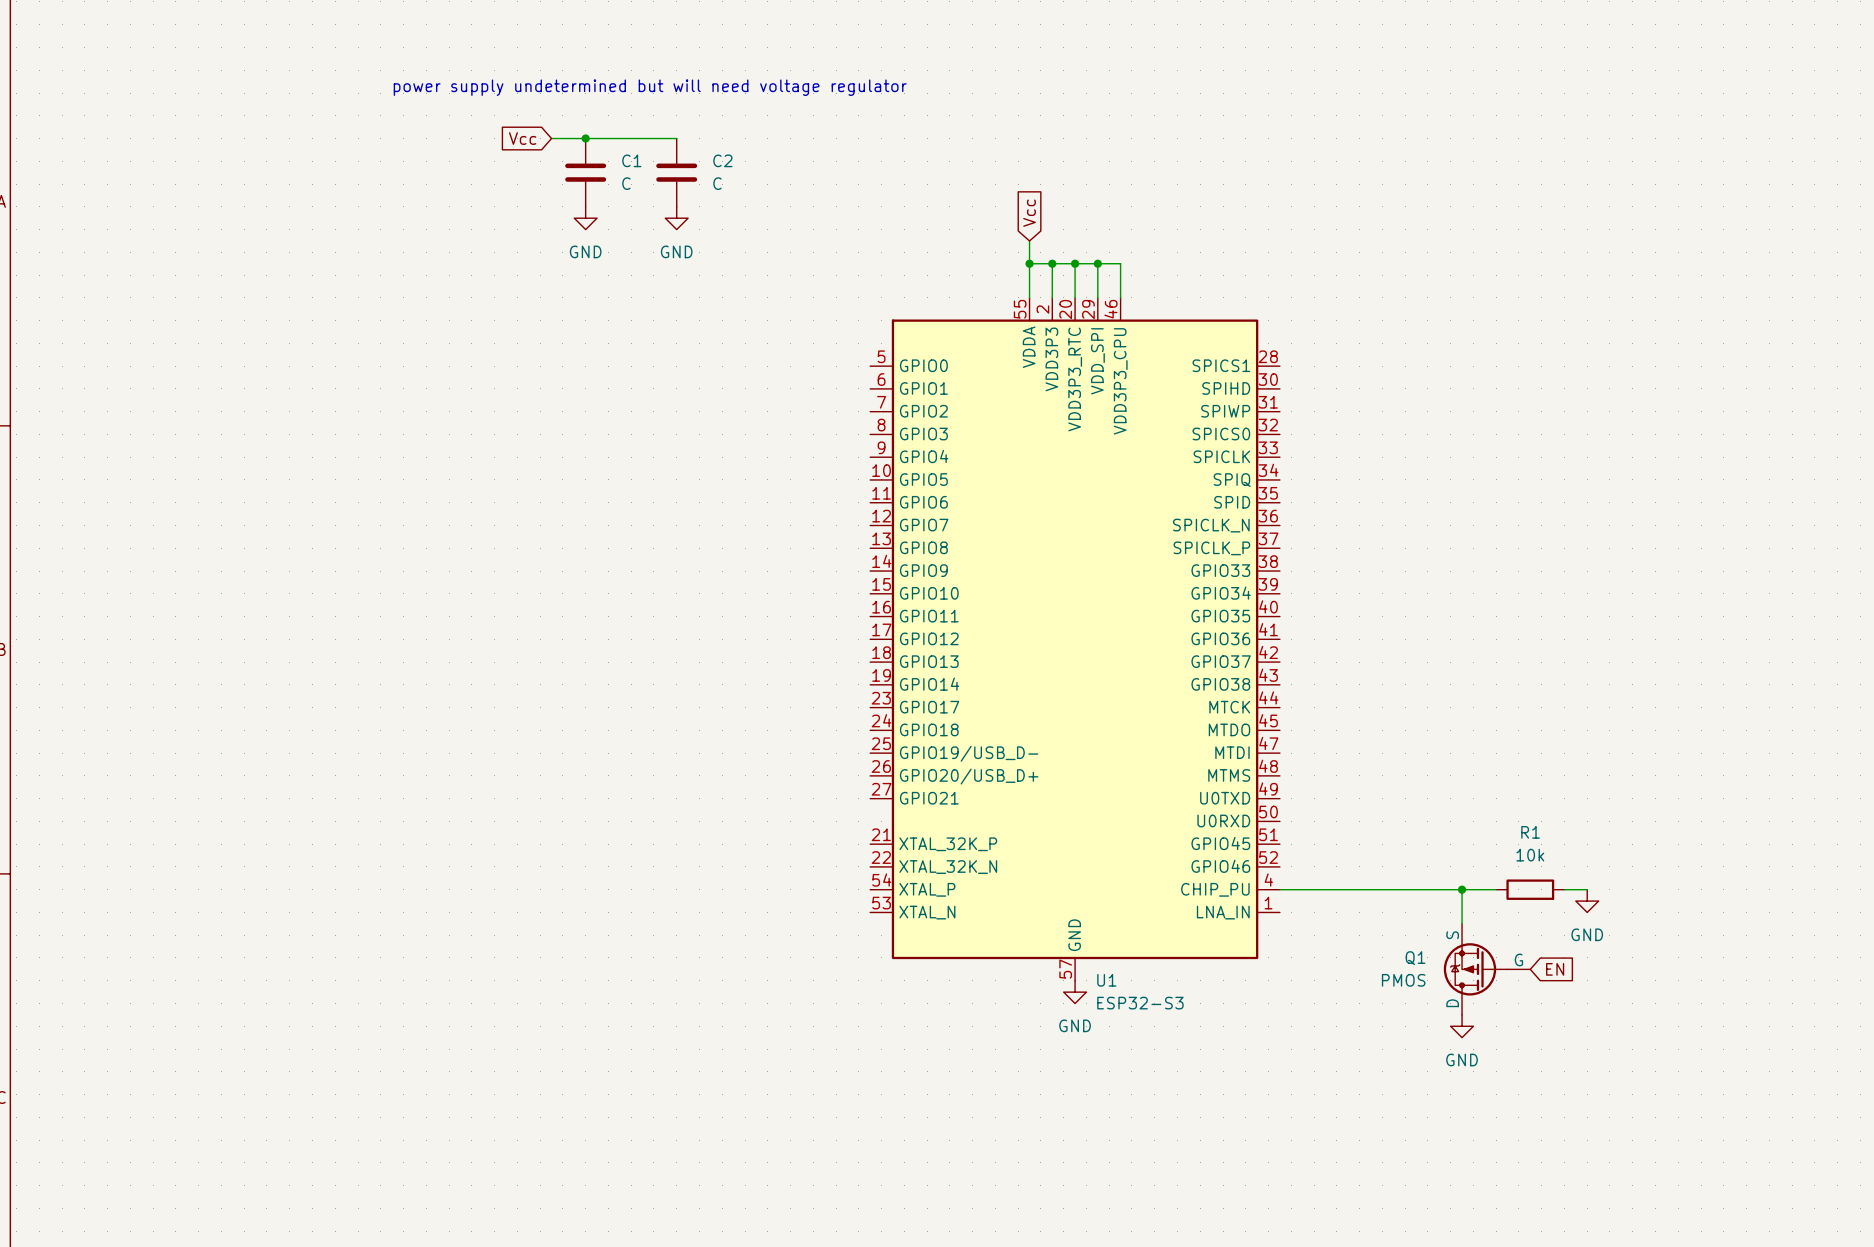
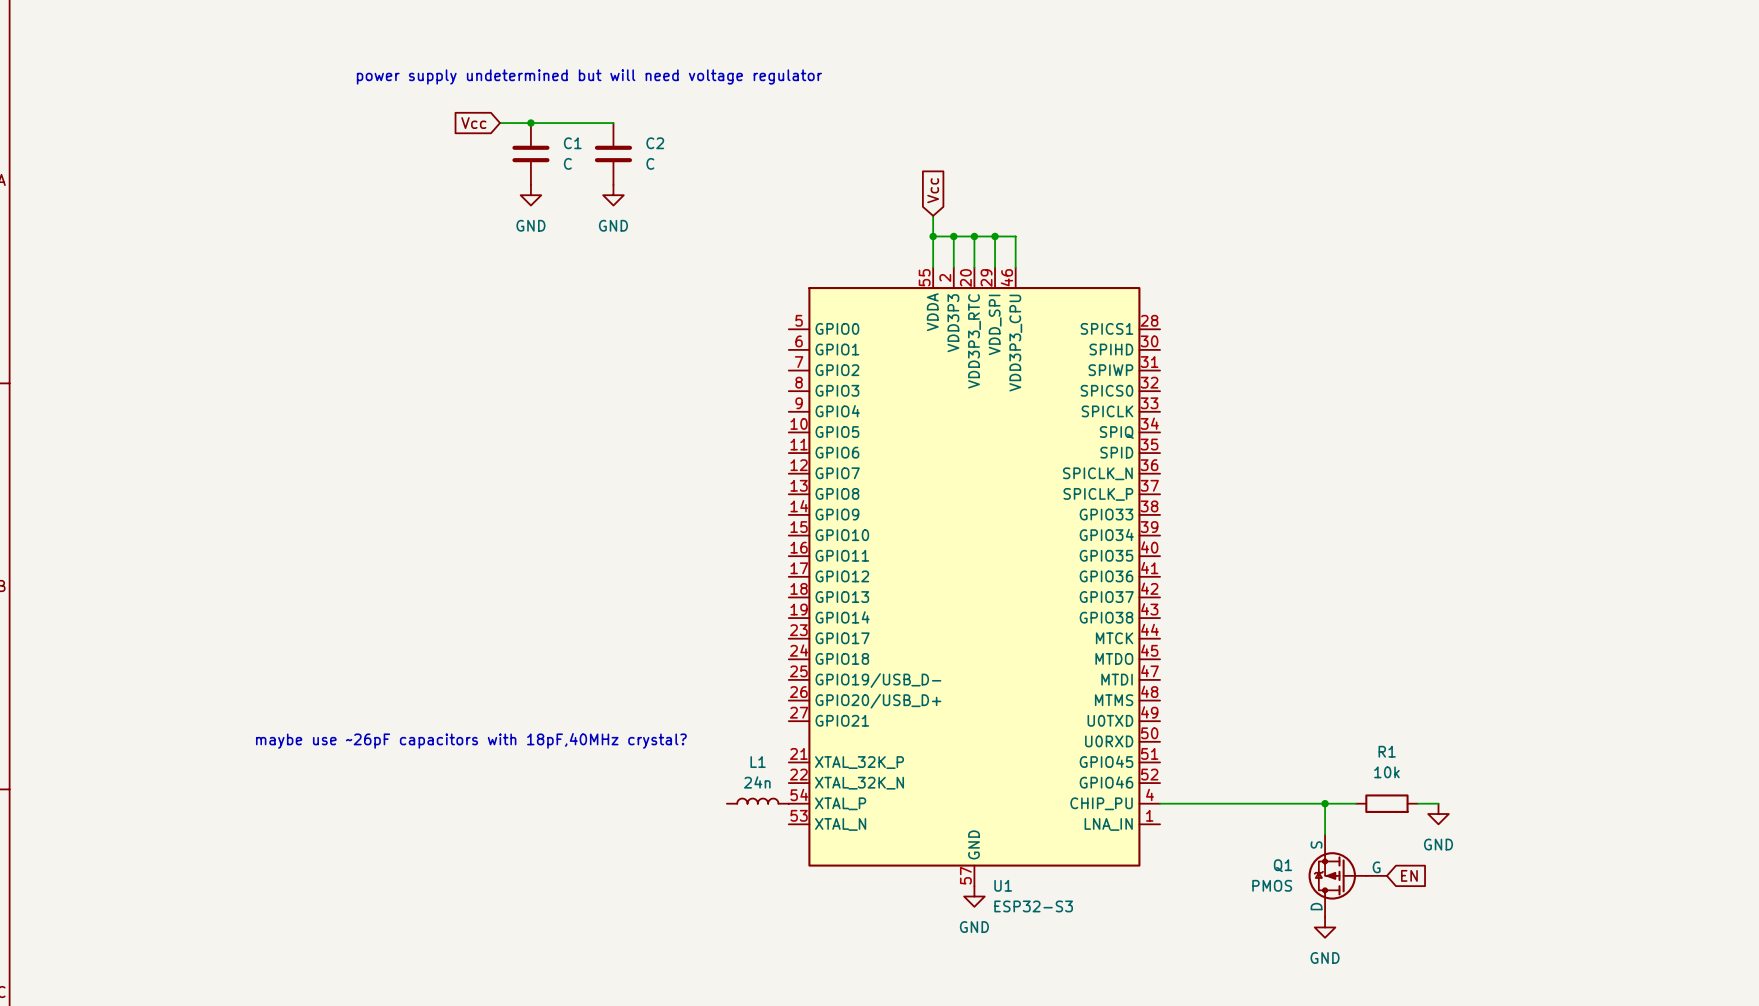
text: none -> maybe use ~26pF capacitors with 18pF,40MHz crystal? (471, 740)
L1: none -> 24n (757, 801)

